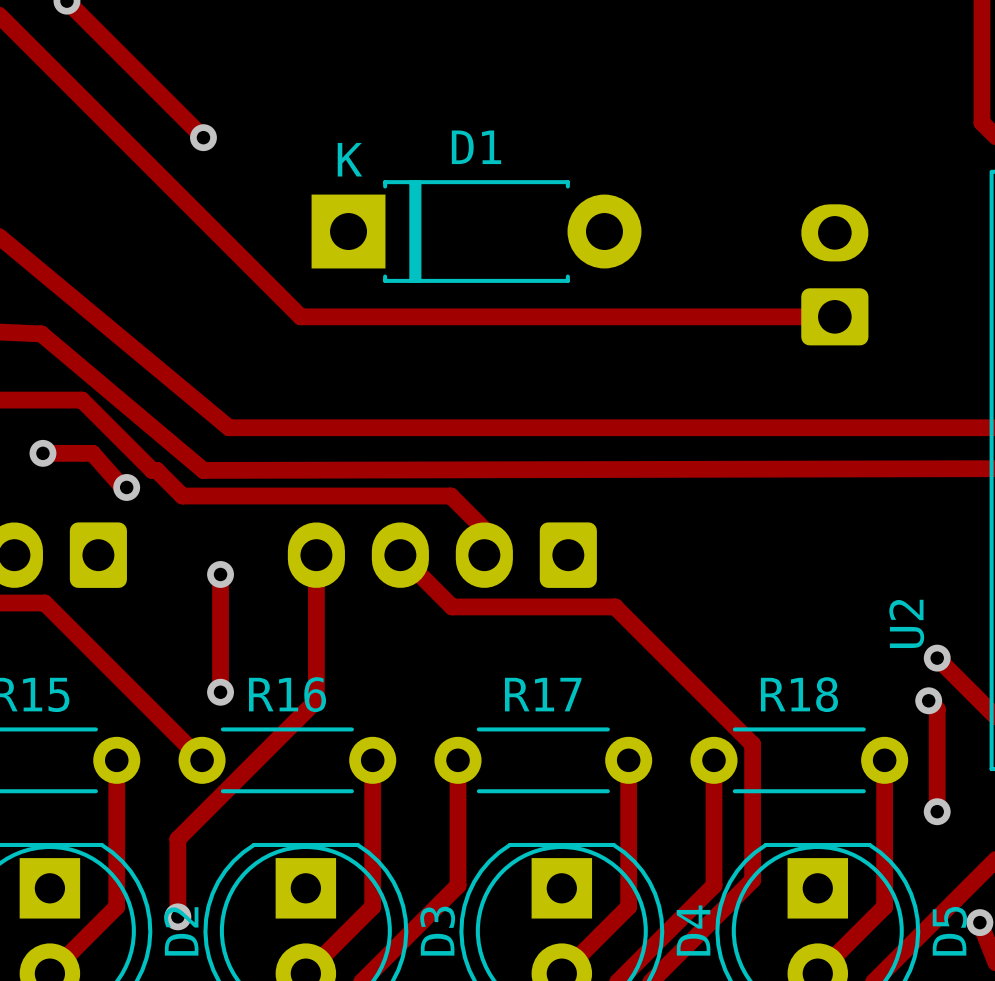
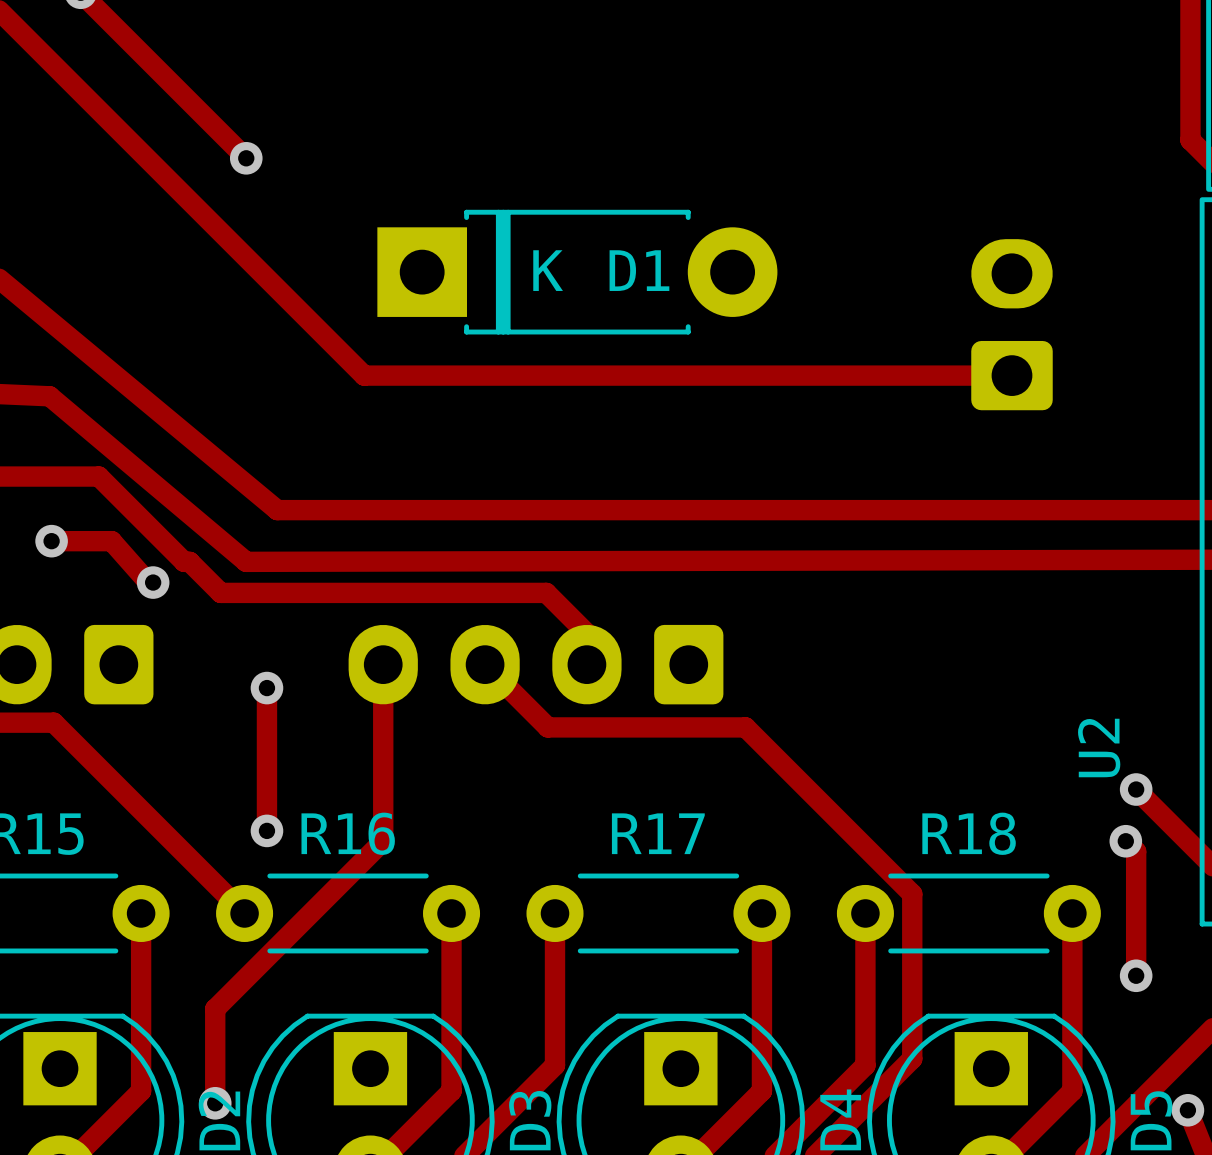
D1 name position: D1 (476, 147) -> D1 (639, 270)
D1 text position: K (349, 159) -> K (548, 270)

